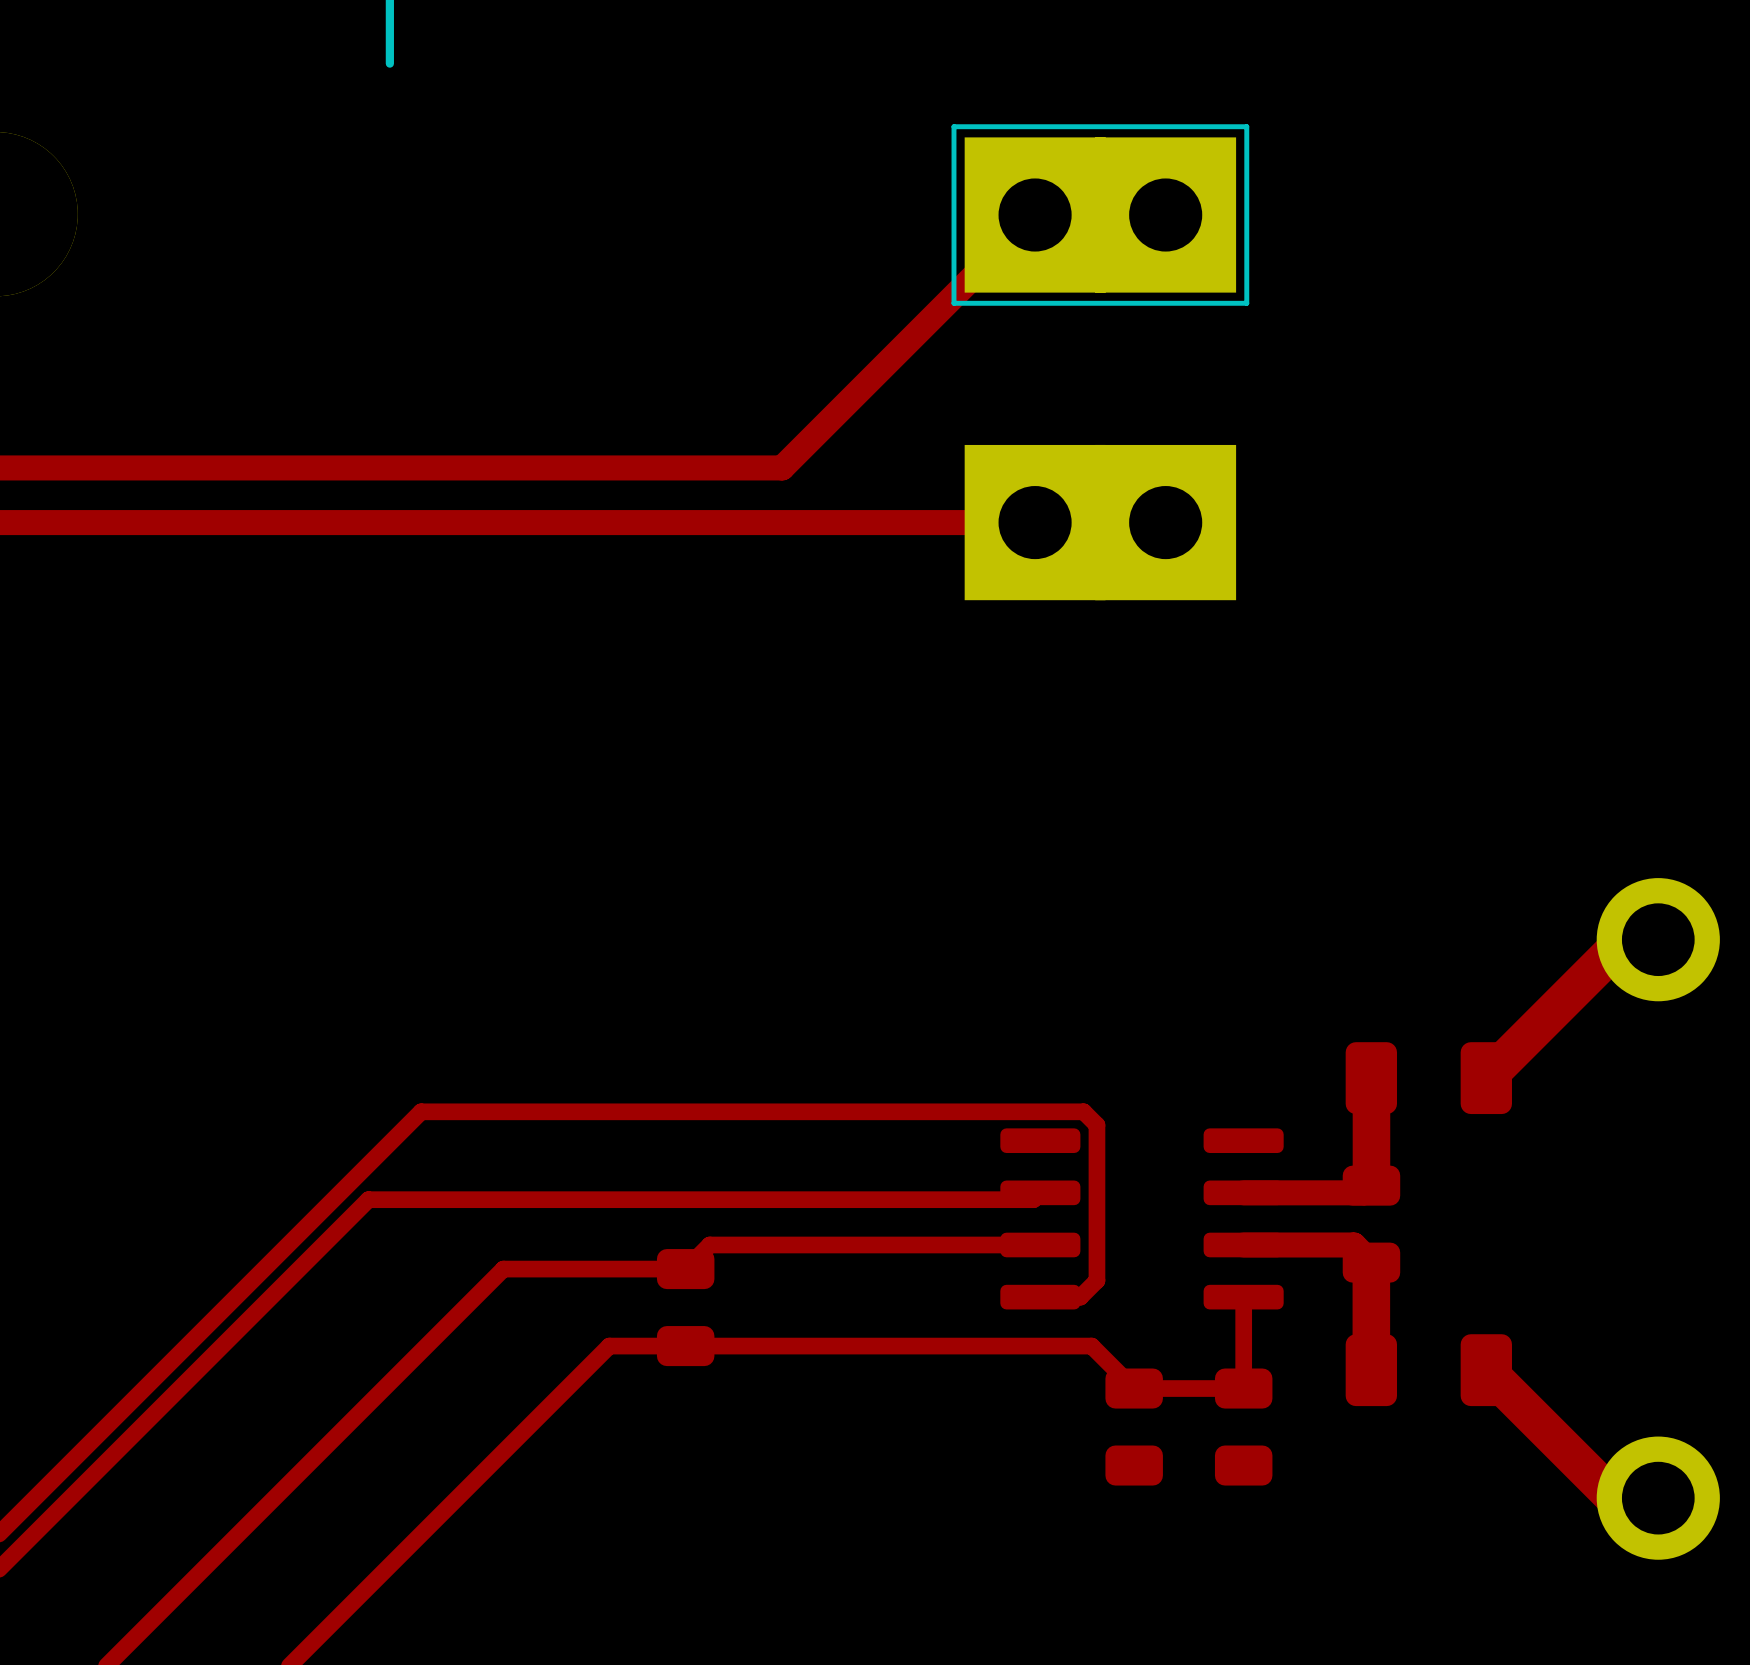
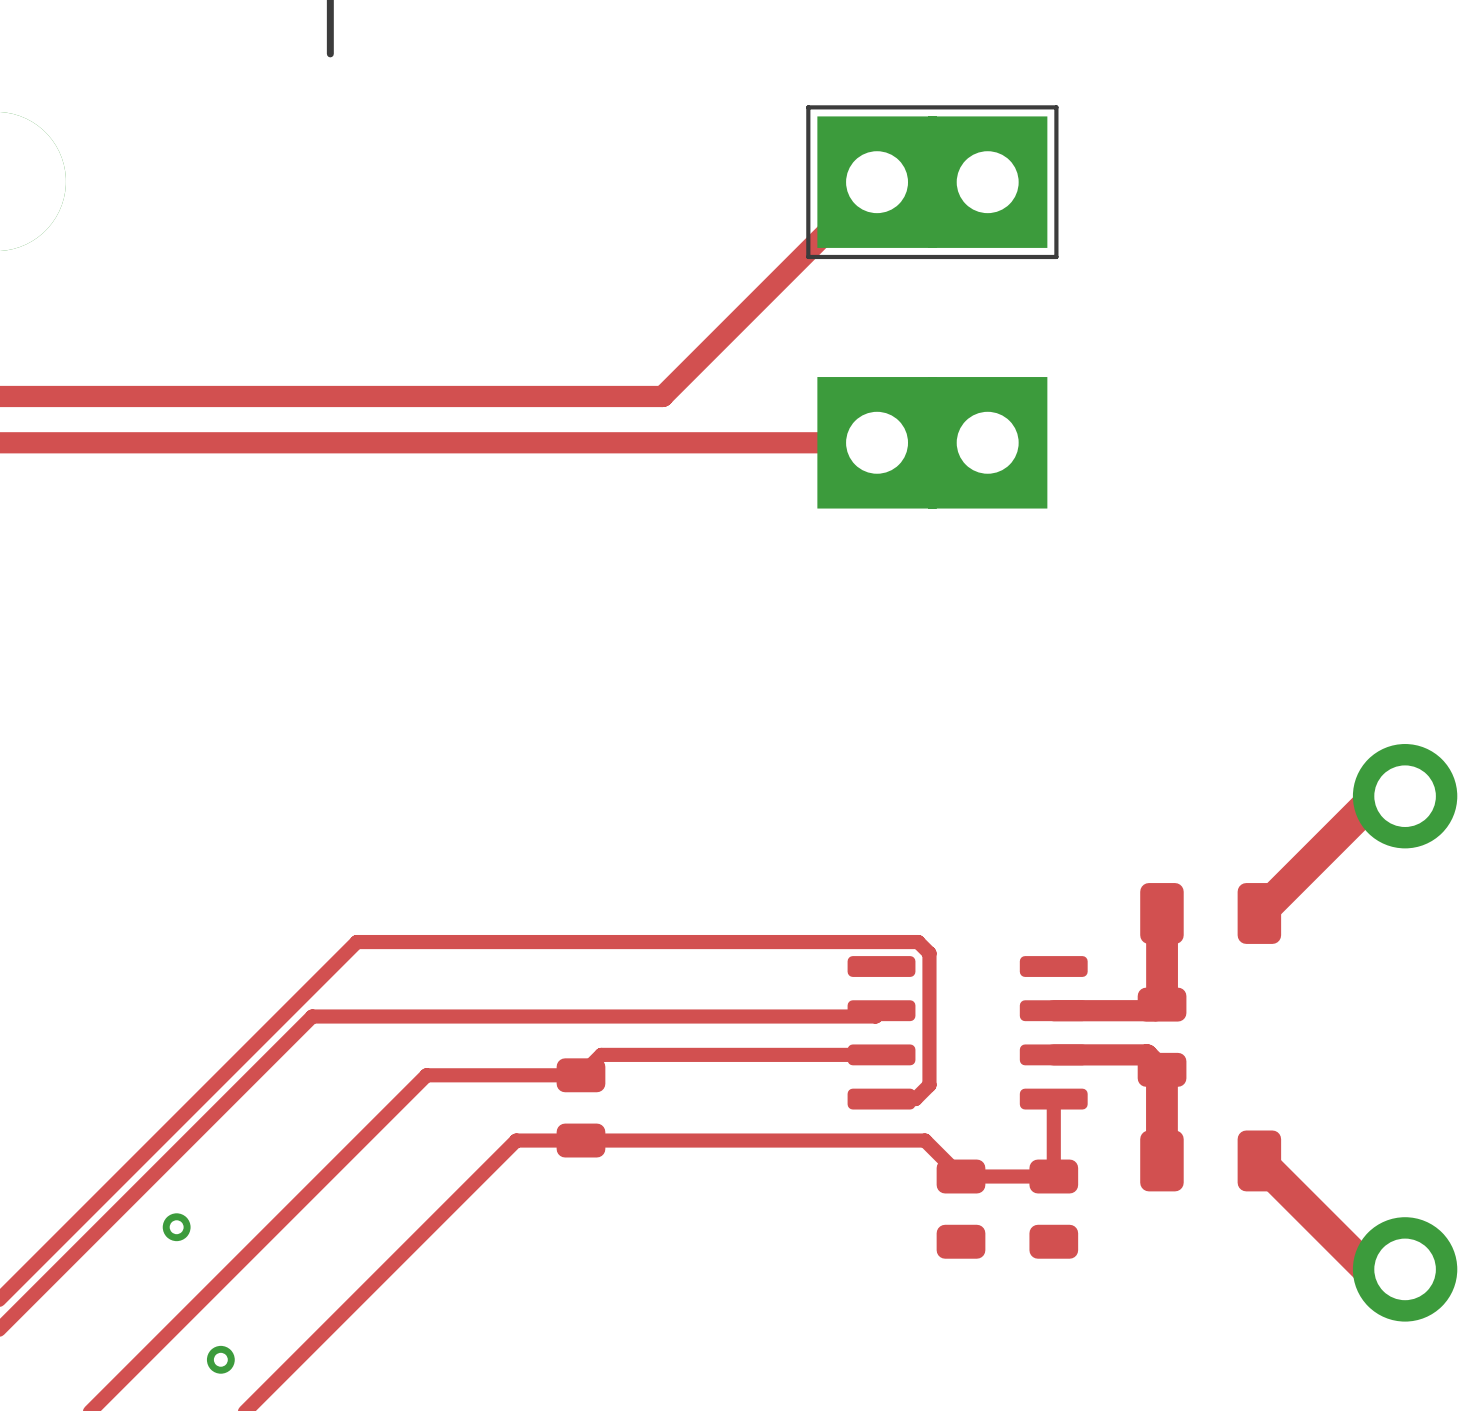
via: none -> (176, 1227)
via: none -> (220, 1359)

